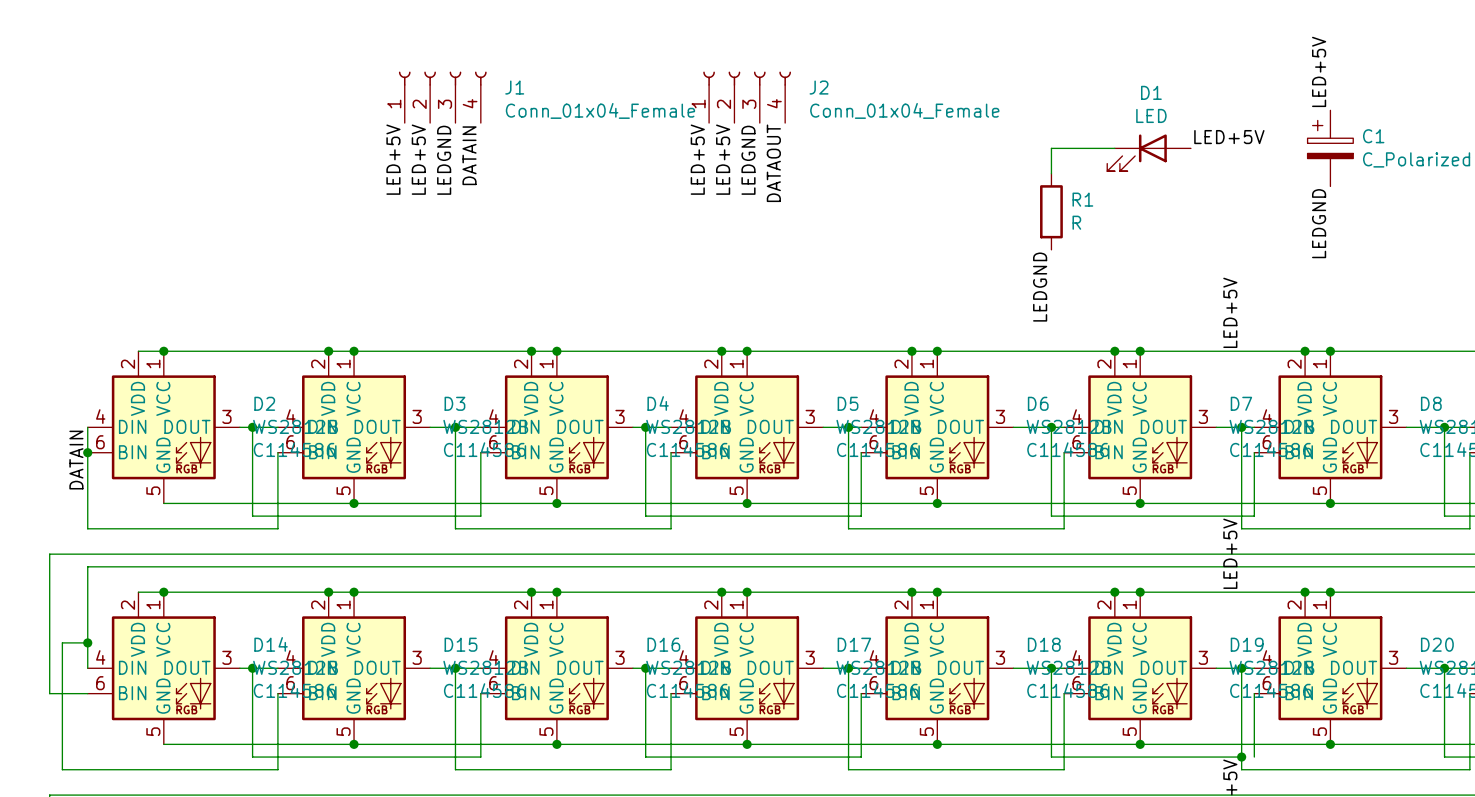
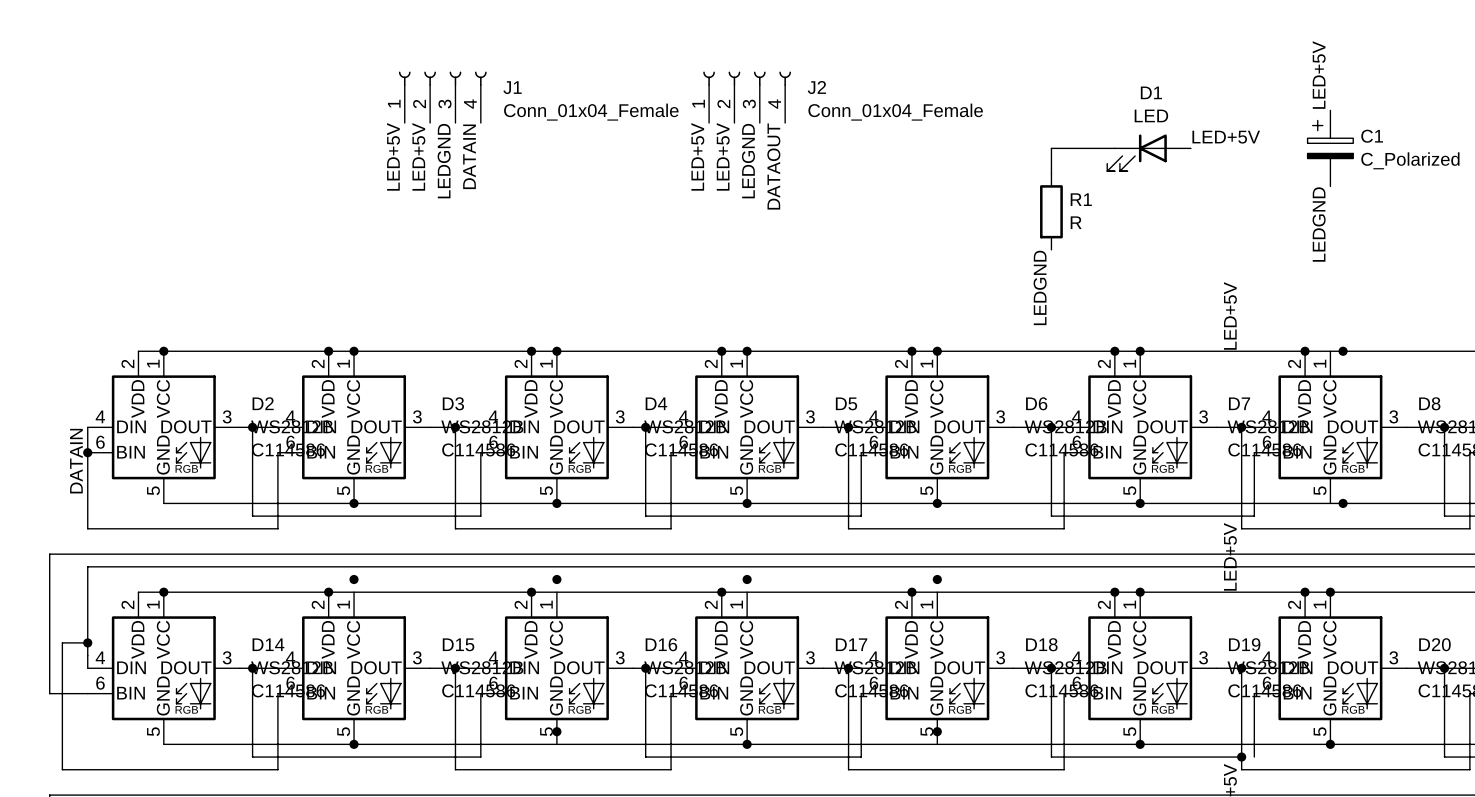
junction position: (1330, 351) -> (1343, 351)
junction position: (1330, 503) -> (1343, 503)
junction position: (354, 592) -> (354, 579)
junction position: (556, 592) -> (556, 579)
junction position: (747, 592) -> (747, 579)
junction position: (937, 592) -> (937, 579)
junction position: (556, 744) -> (556, 731)
junction position: (937, 744) -> (937, 731)

